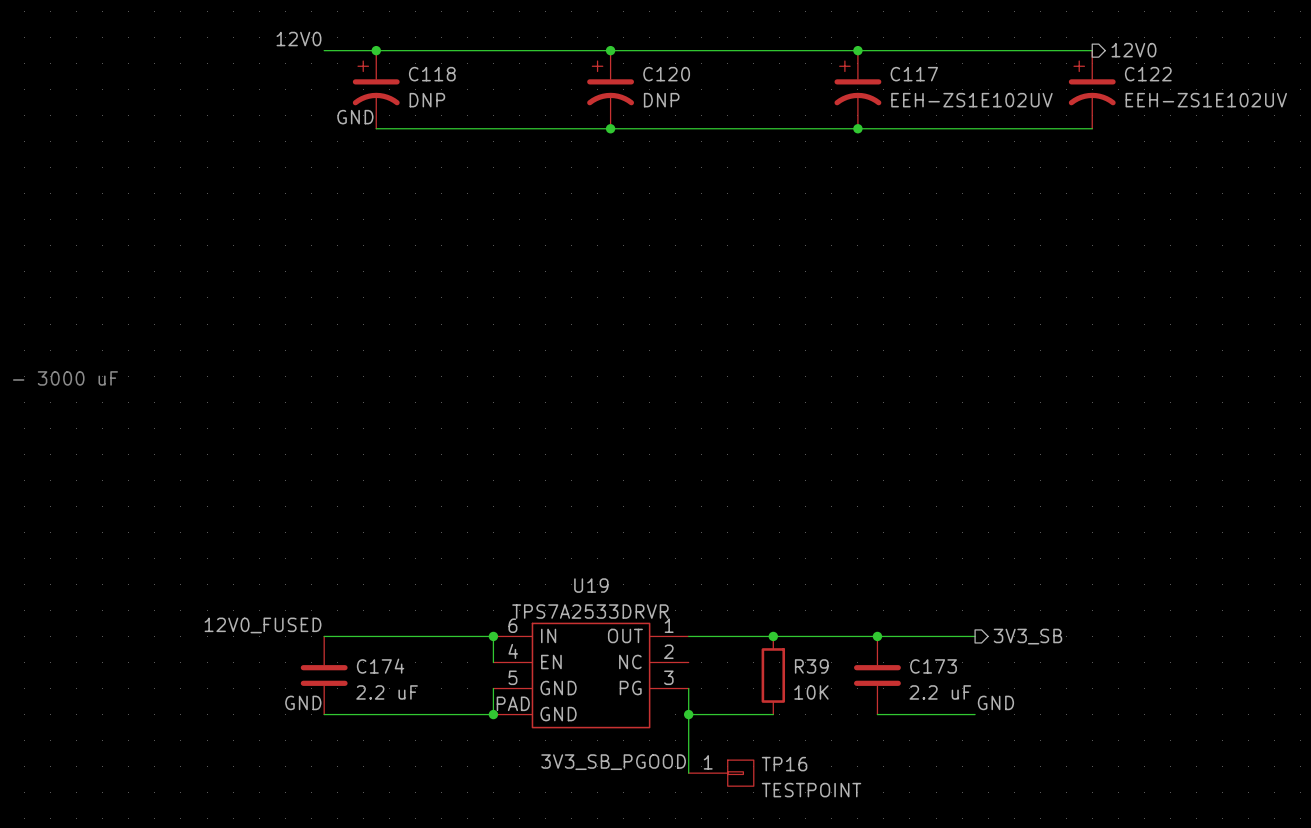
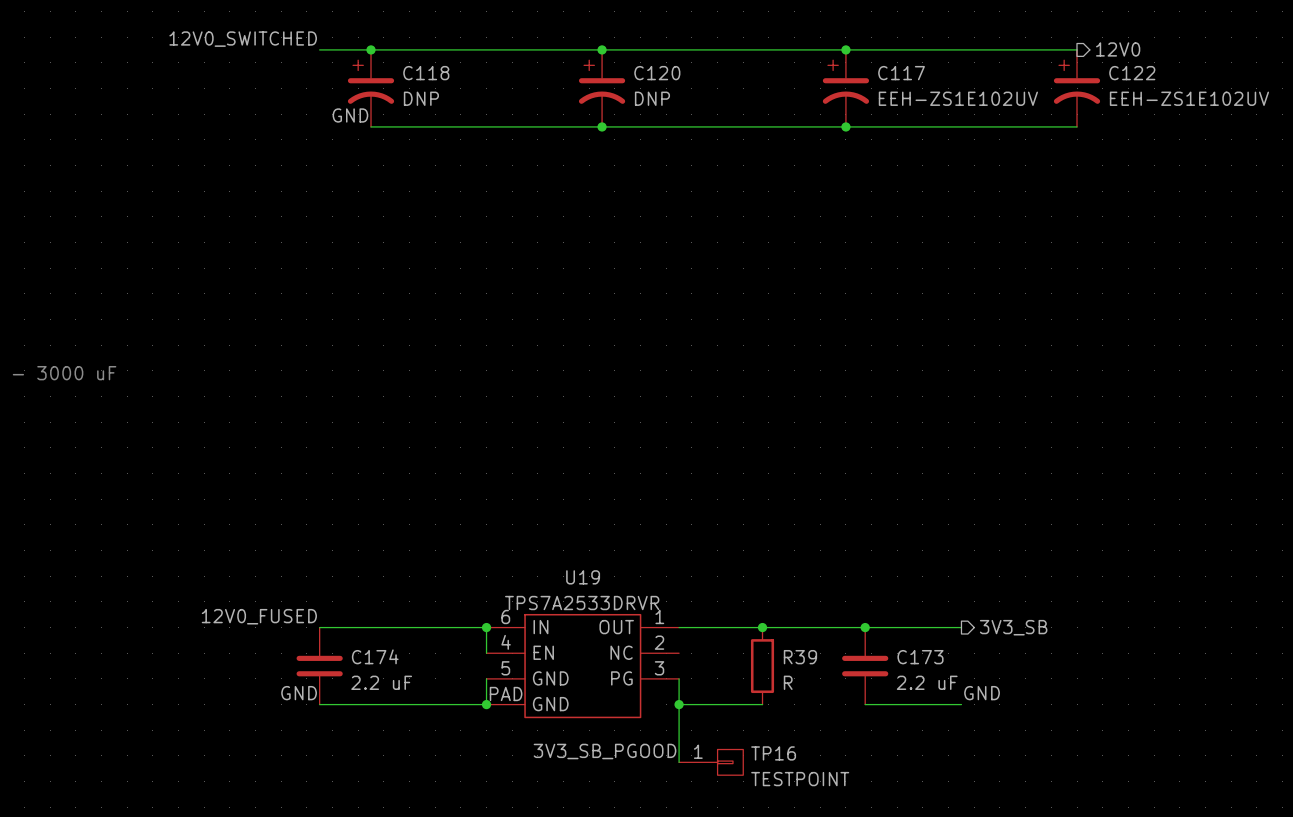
label: 12V0 (298, 39) -> 12V0_SWITCHED (243, 39)
R39 value: 10K (811, 692) -> R (788, 682)

